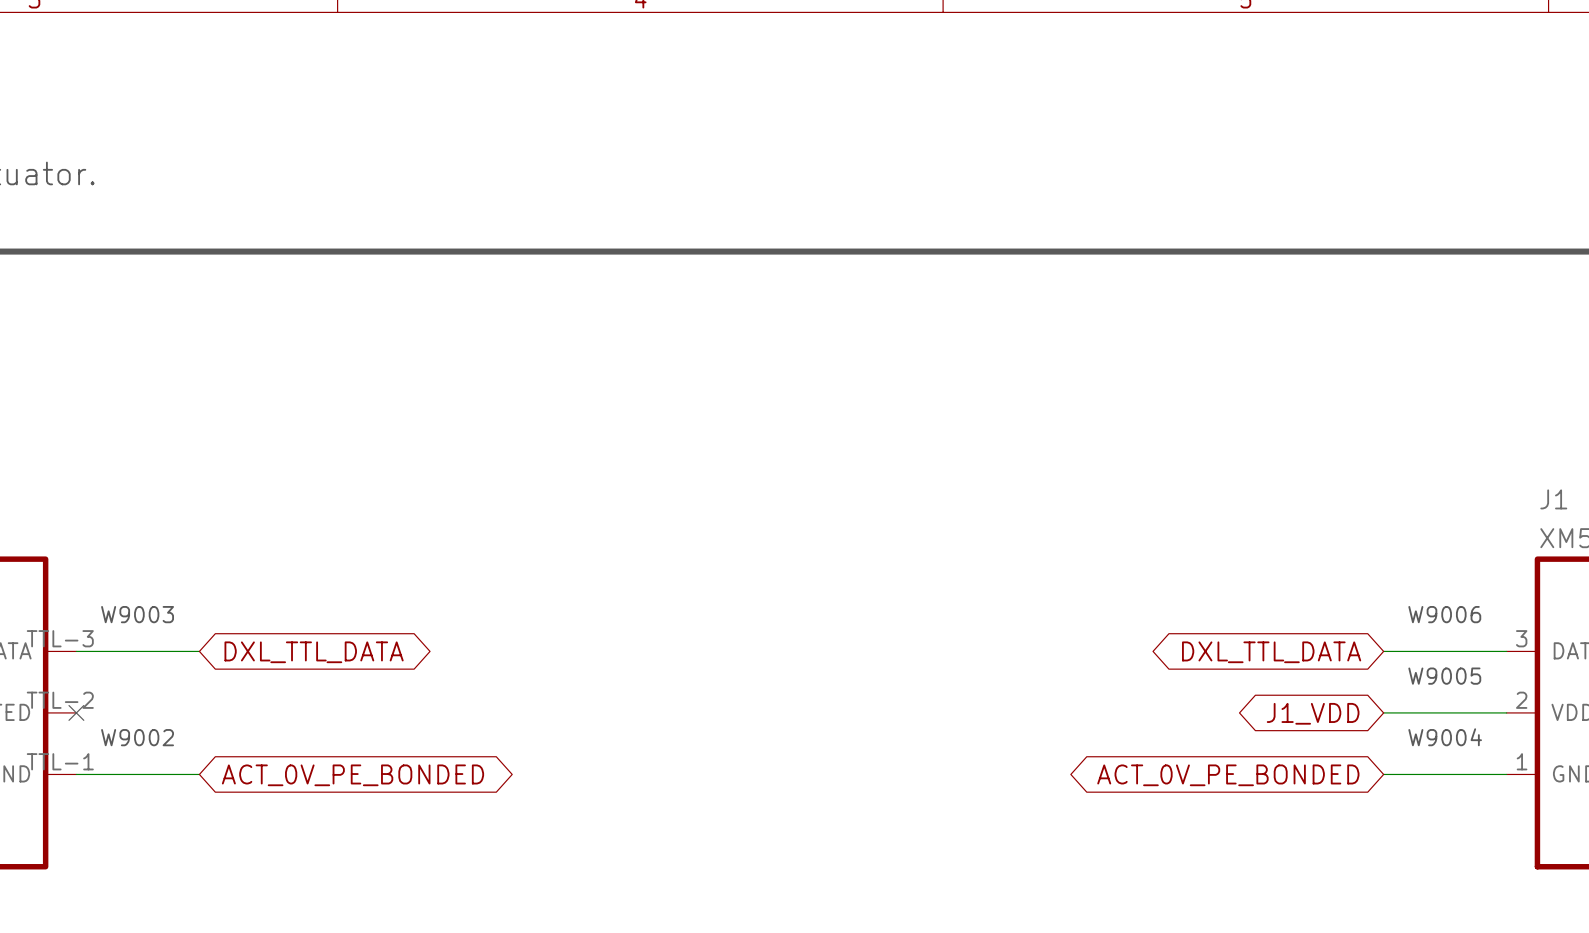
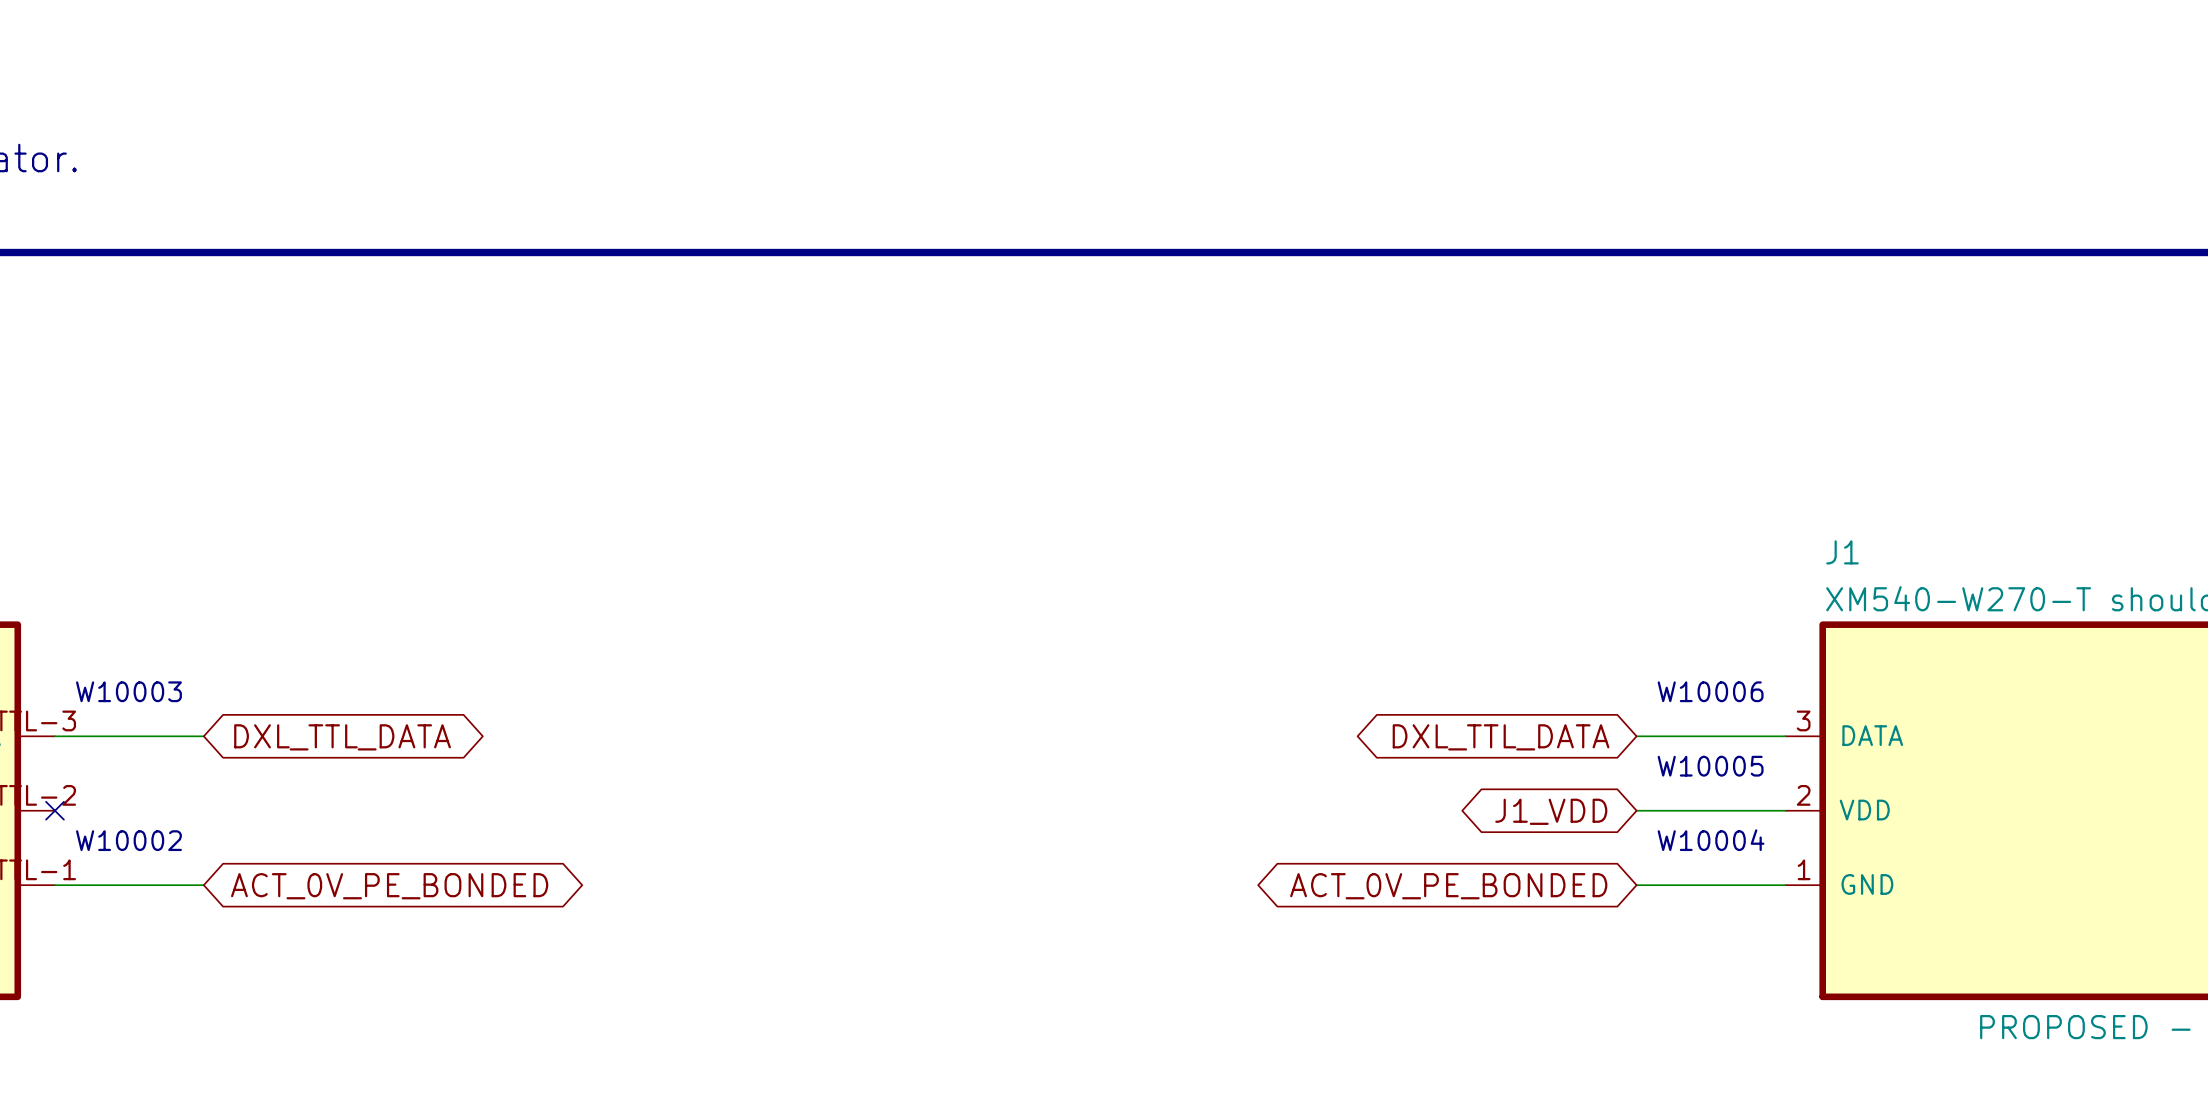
text: W9003 (137, 614) -> W10003 (128, 691)
text: W9006 (1444, 614) -> W10006 (1710, 691)
text: W9005 (1444, 676) -> W10005 (1710, 766)
text: W9002 (137, 737) -> W10002 (128, 840)
text: W9004 (1445, 737) -> W10004 (1711, 840)

